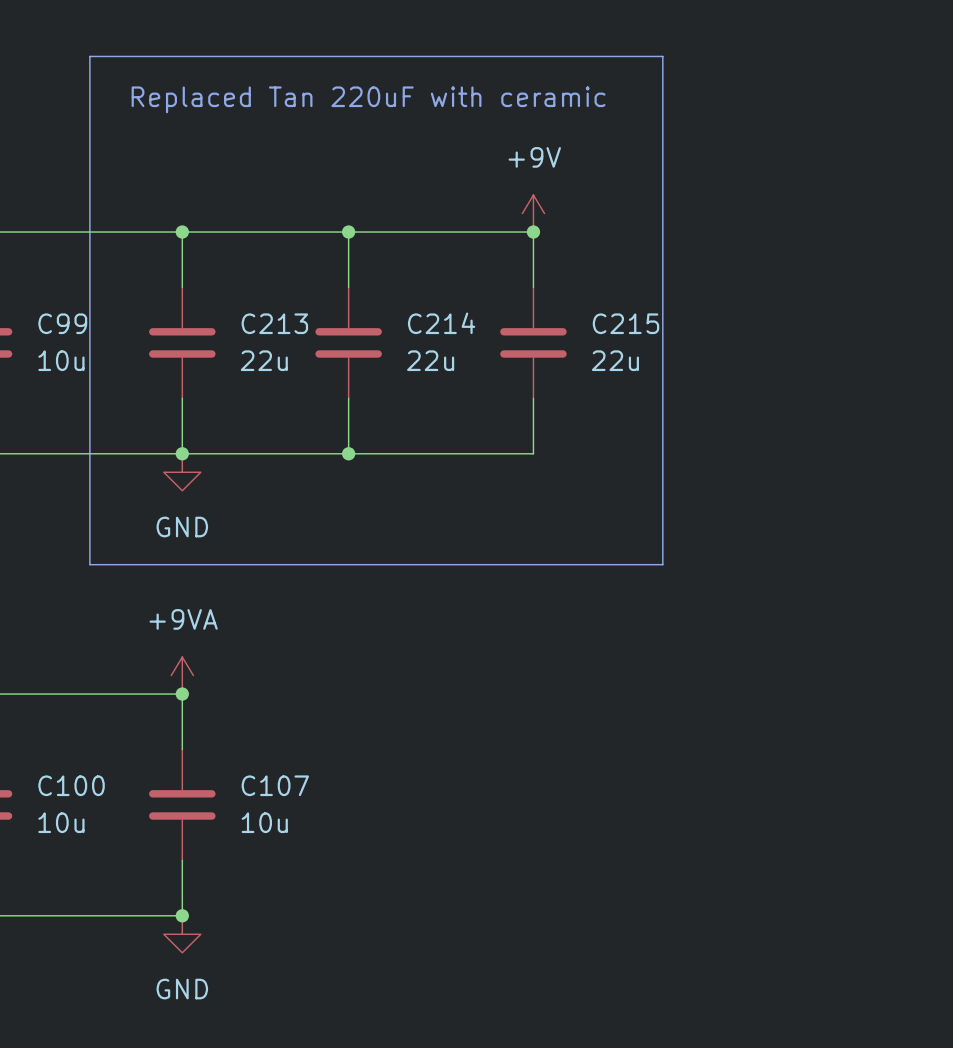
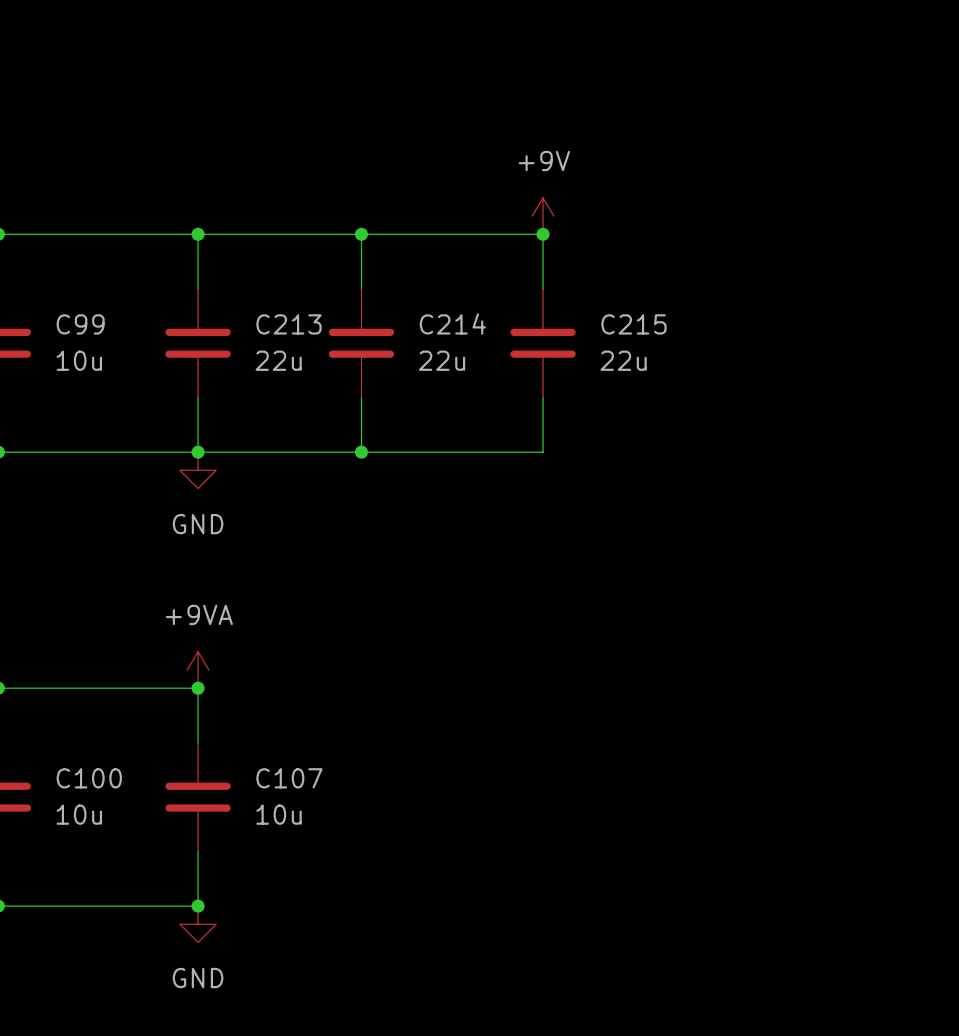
line: (89, 56) (662, 56) (662, 564) (89, 564) (89, 56) -> none
text: Replaced Tan 220uF with ceramic (368, 99) -> none

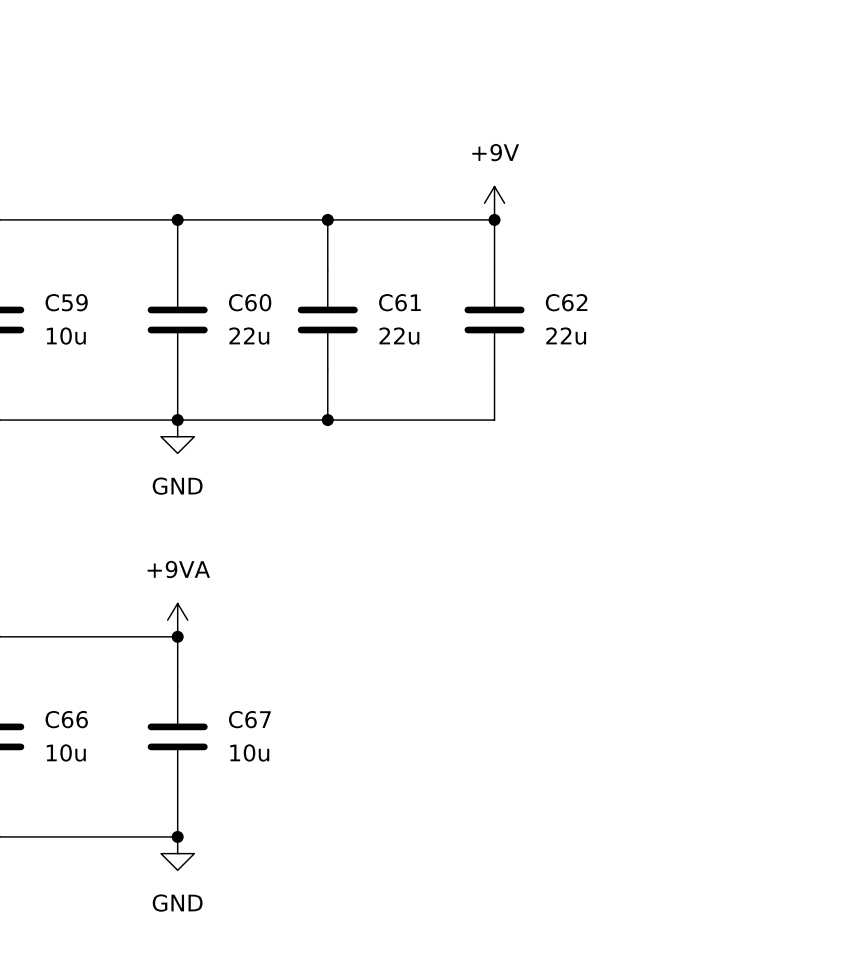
C214 name: C214 (452, 323) -> C61 (399, 302)
C99 name: C99 (80, 324) -> C59 (66, 302)
C213 name: C213 (288, 324) -> C60 (250, 302)
C215 name: C215 (633, 324) -> C62 (566, 302)
C100 name: C100 (89, 778) -> C66 (66, 719)
C107 name: C107 (289, 778) -> C67 (249, 719)

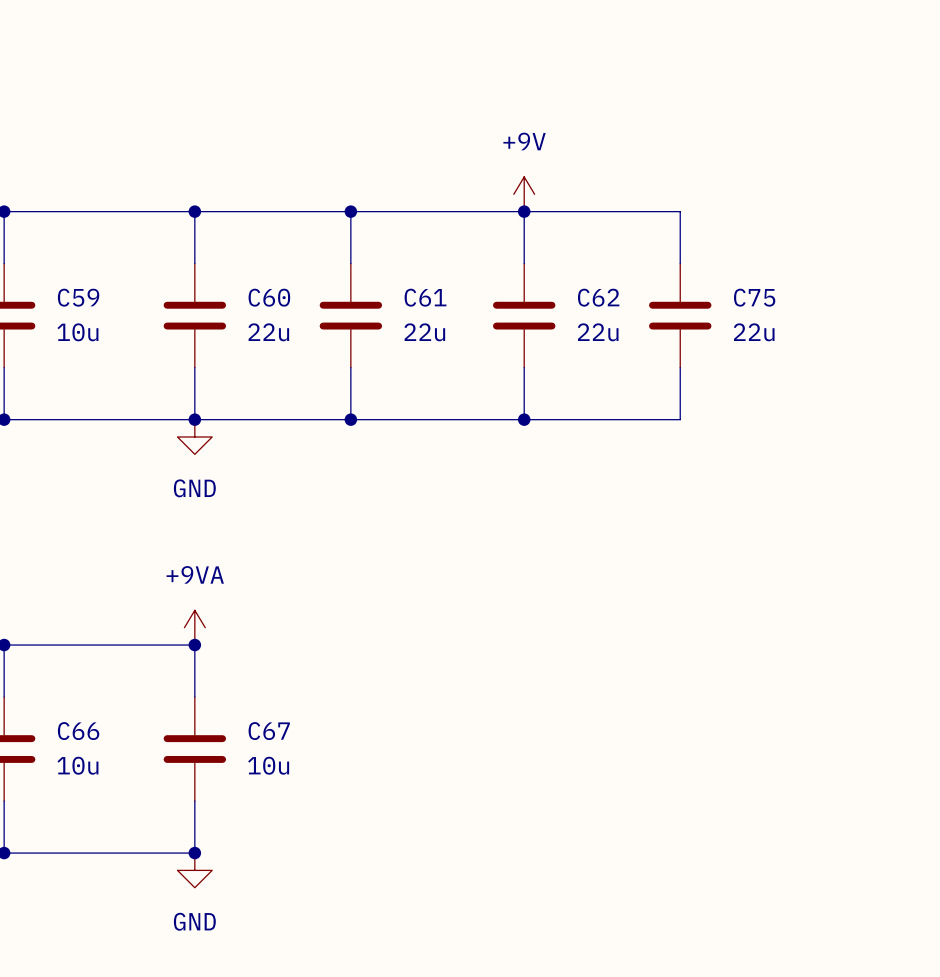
wire: none -> (524, 211) (680, 211) (680, 263)
C75: none -> 22u (680, 315)
wire: none -> (680, 367) (680, 419) (524, 419)
junction: none -> (524, 419)

